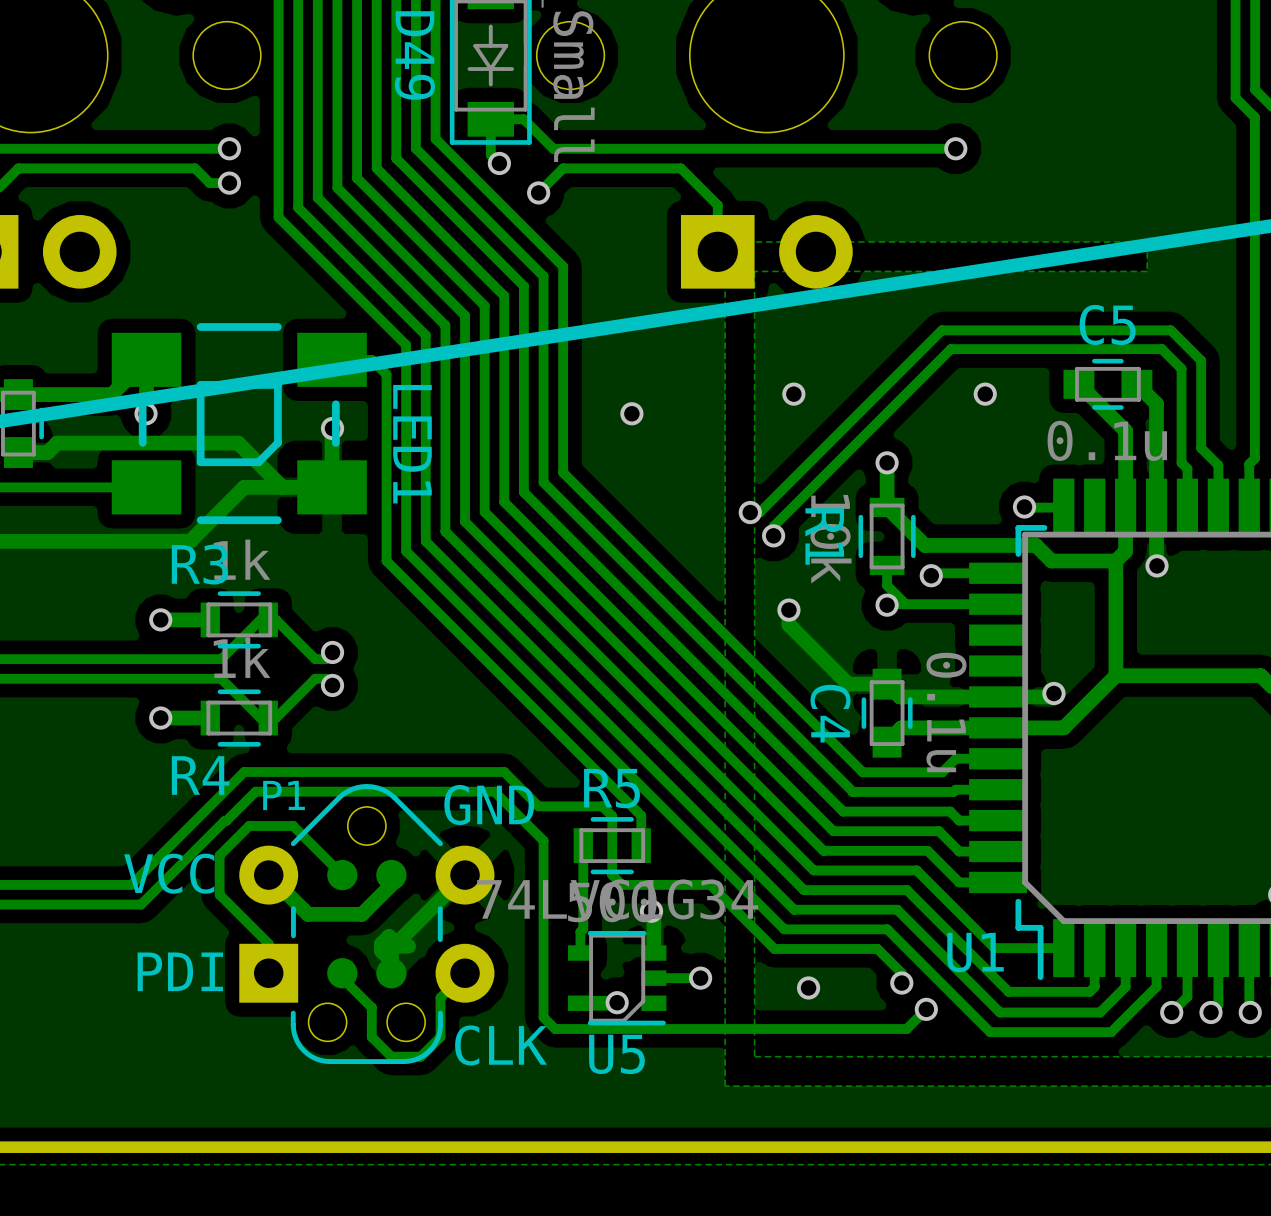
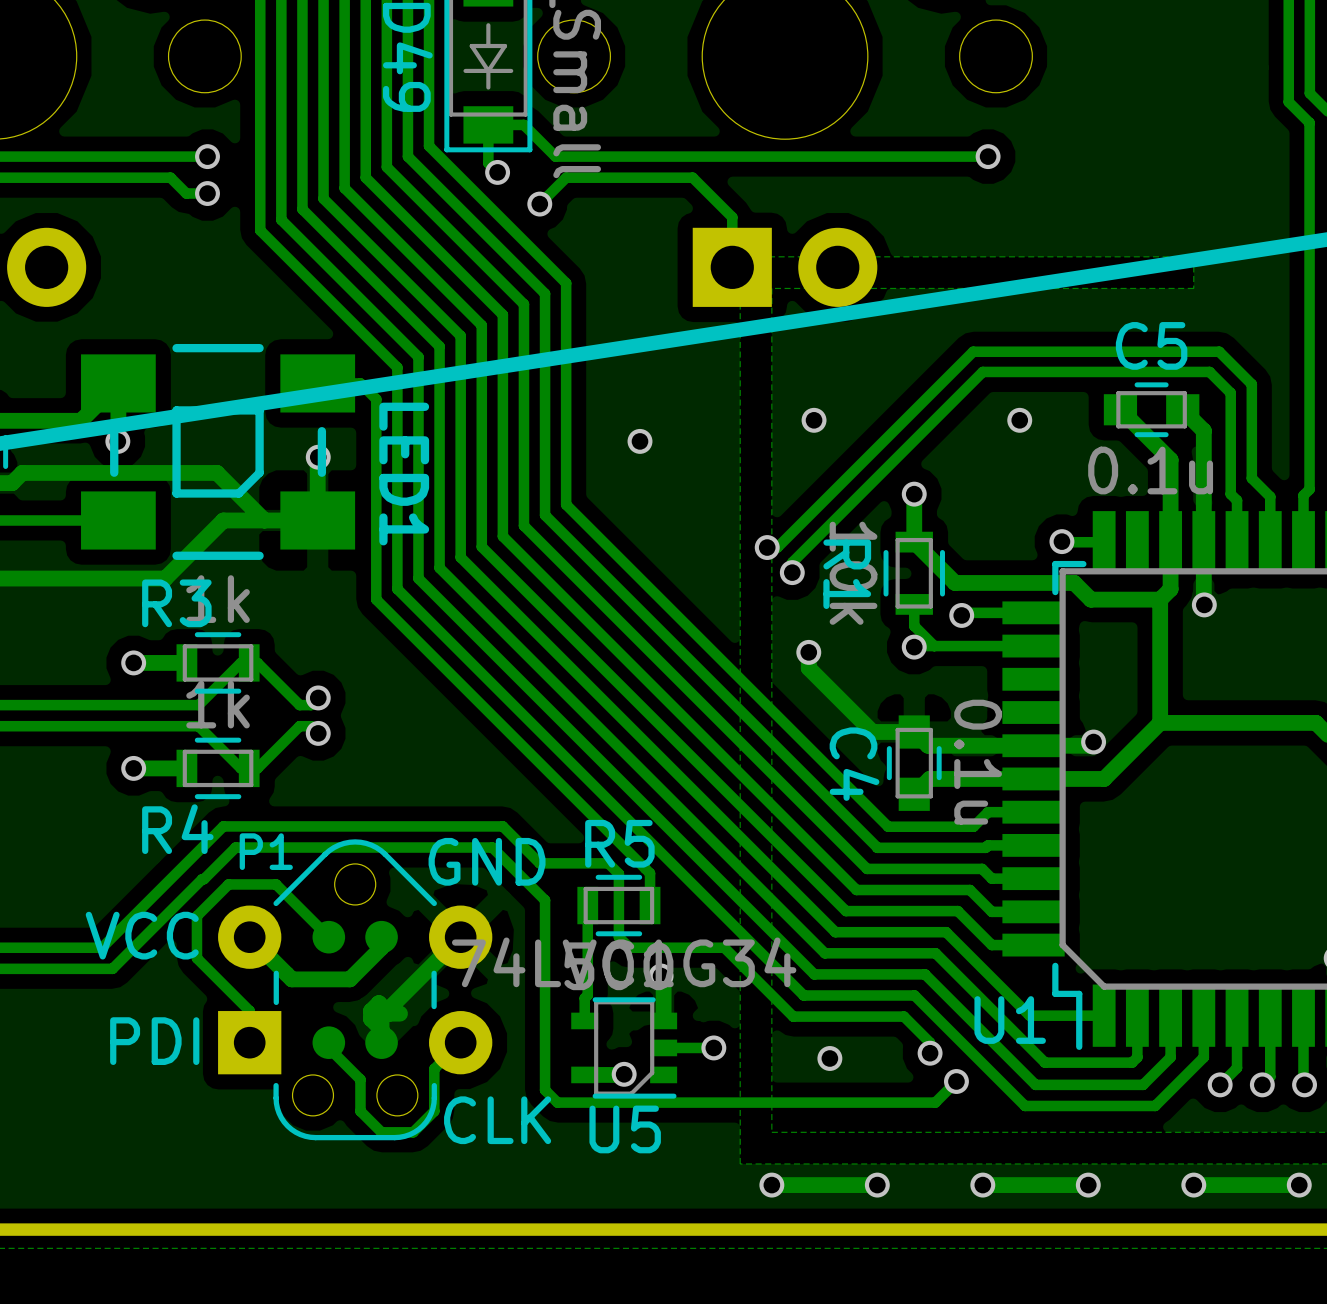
via: none -> (771, 1185)
track: none -> (877, 1185) (771, 1185)
via: none -> (877, 1185)
via: none -> (982, 1185)
track: none -> (1088, 1185) (982, 1185)
via: none -> (1088, 1185)
via: none -> (1193, 1185)
track: none -> (1299, 1185) (1193, 1185)
via: none -> (1299, 1185)

